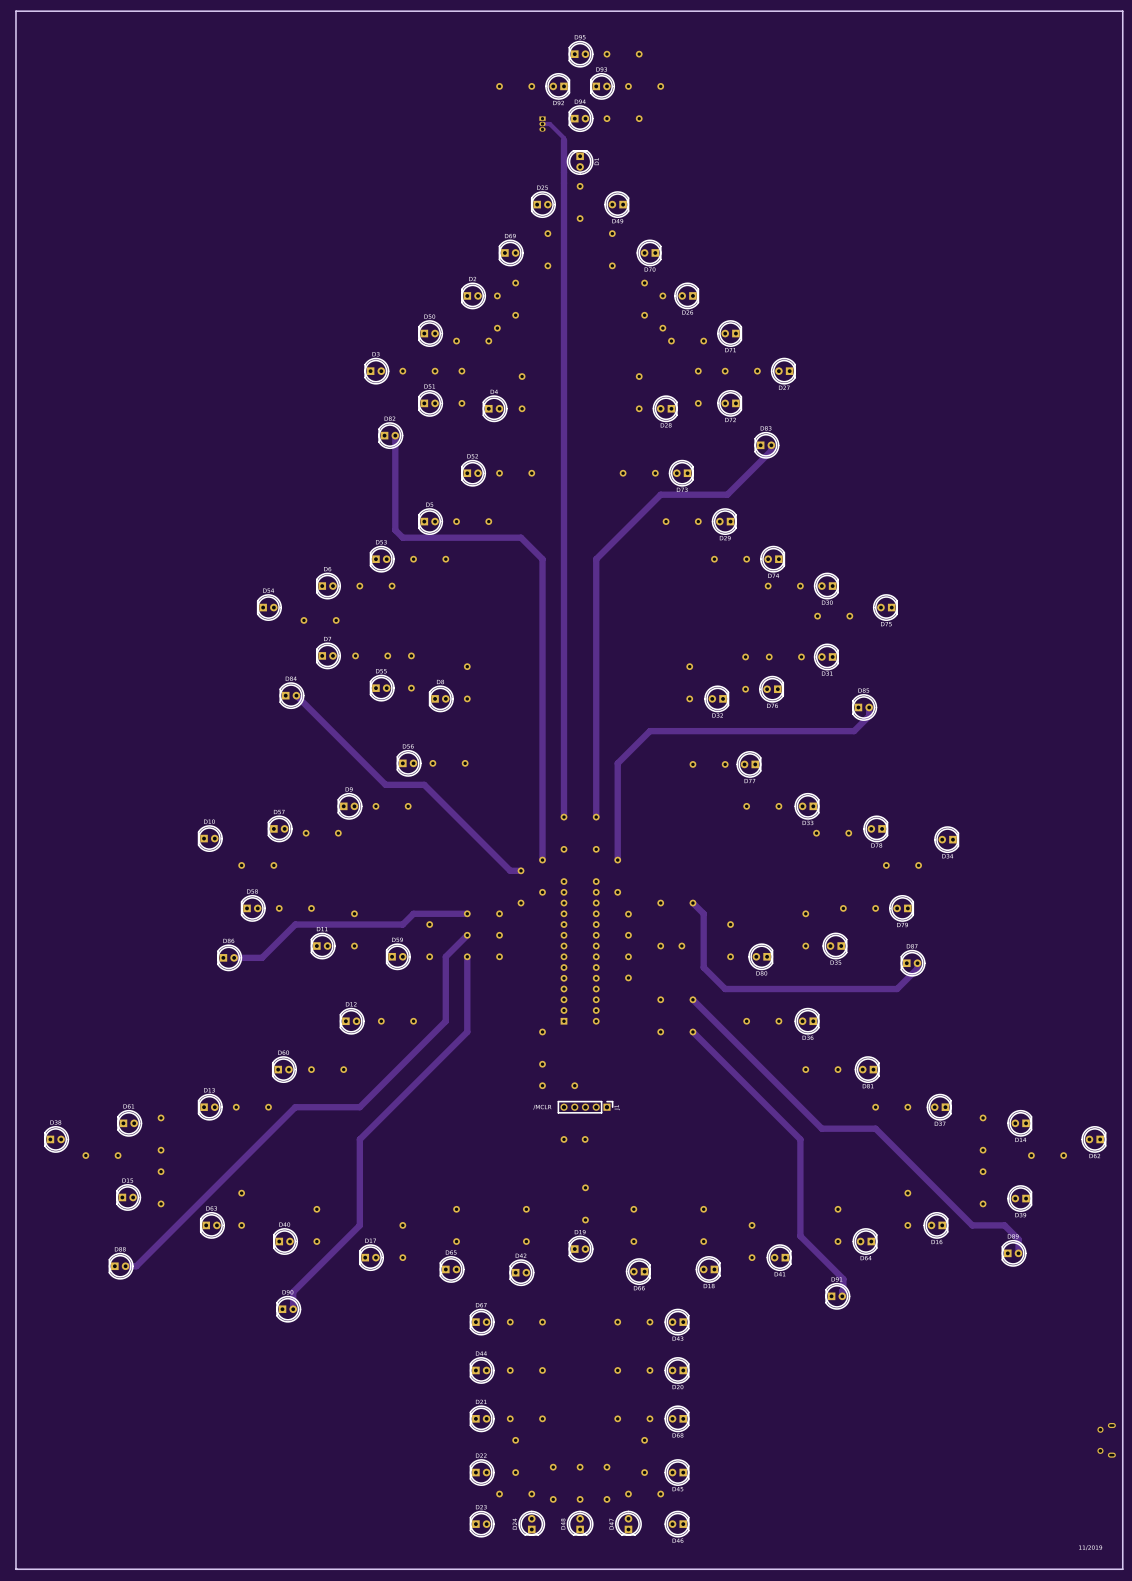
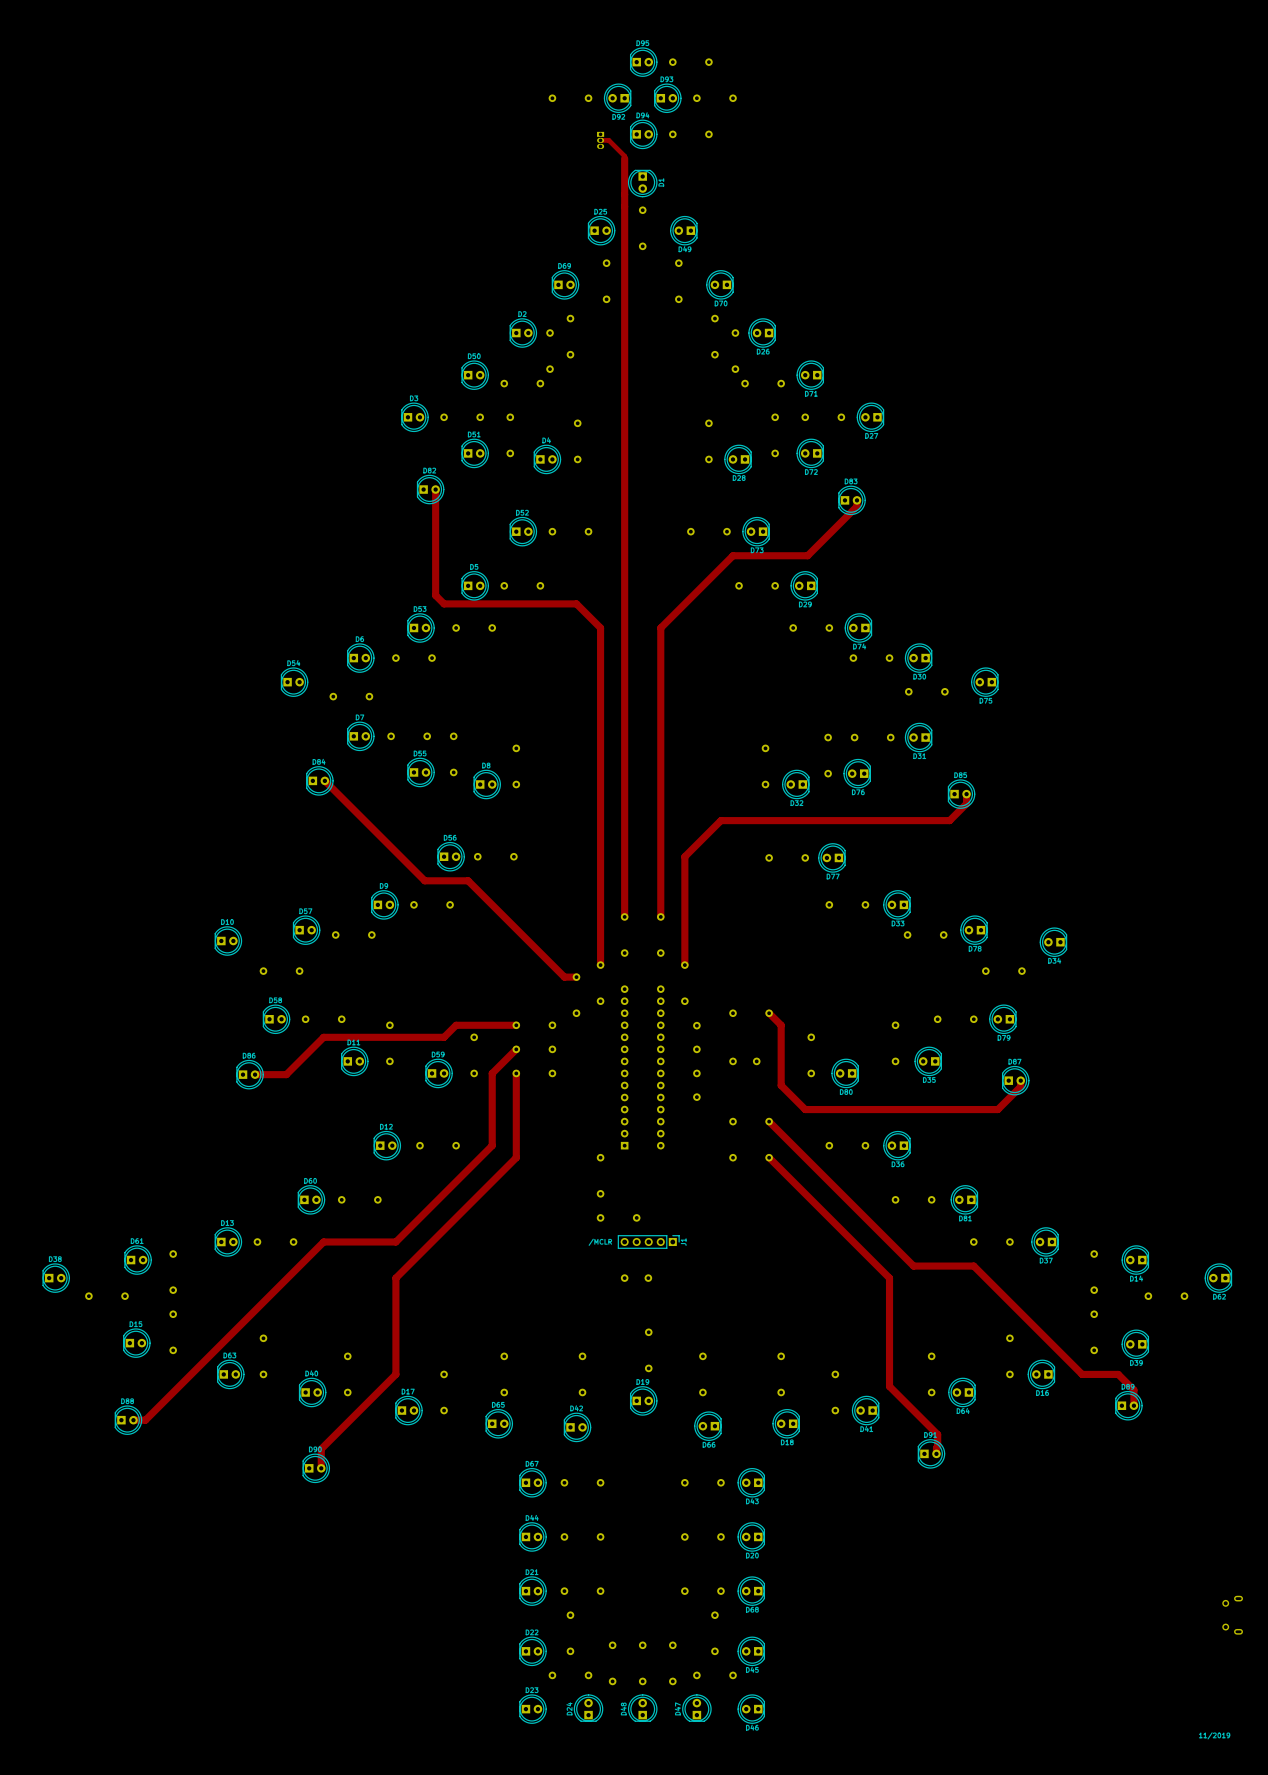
board edge: (15, 11) (15, 1569) (1122, 1569) (1122, 11) (15, 11) -> none

